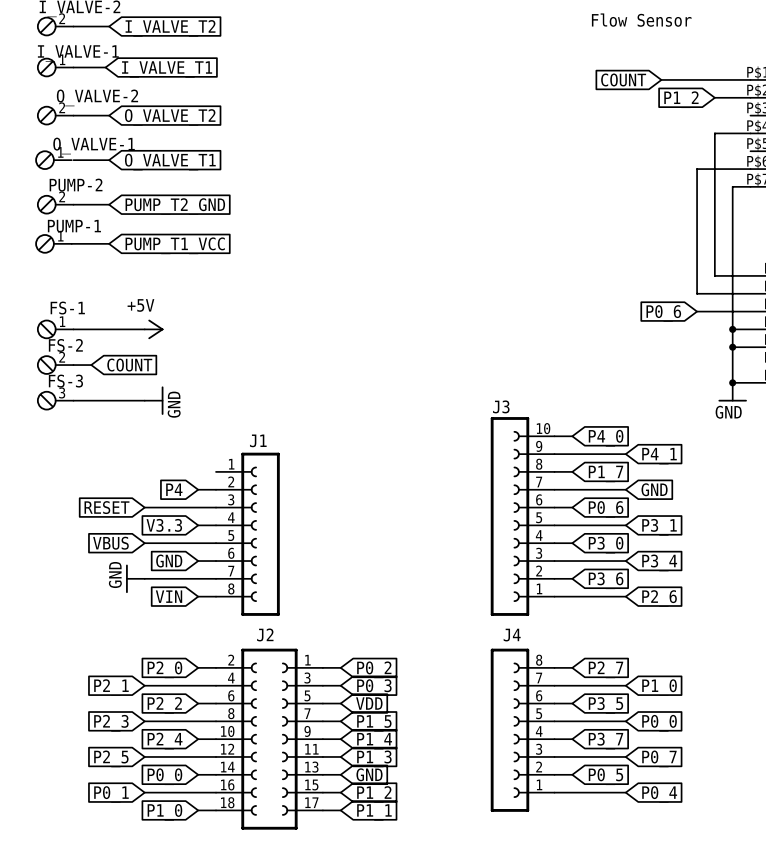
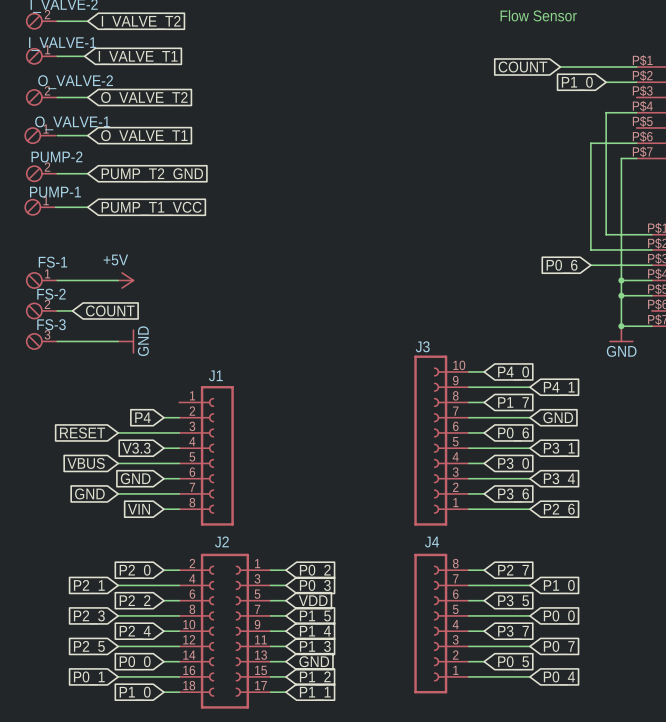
global label: P1_2 (681, 99) -> P1_0 (577, 83)
global label: none -> GND (89, 493)
power symbol: GND (135, 578) -> none

